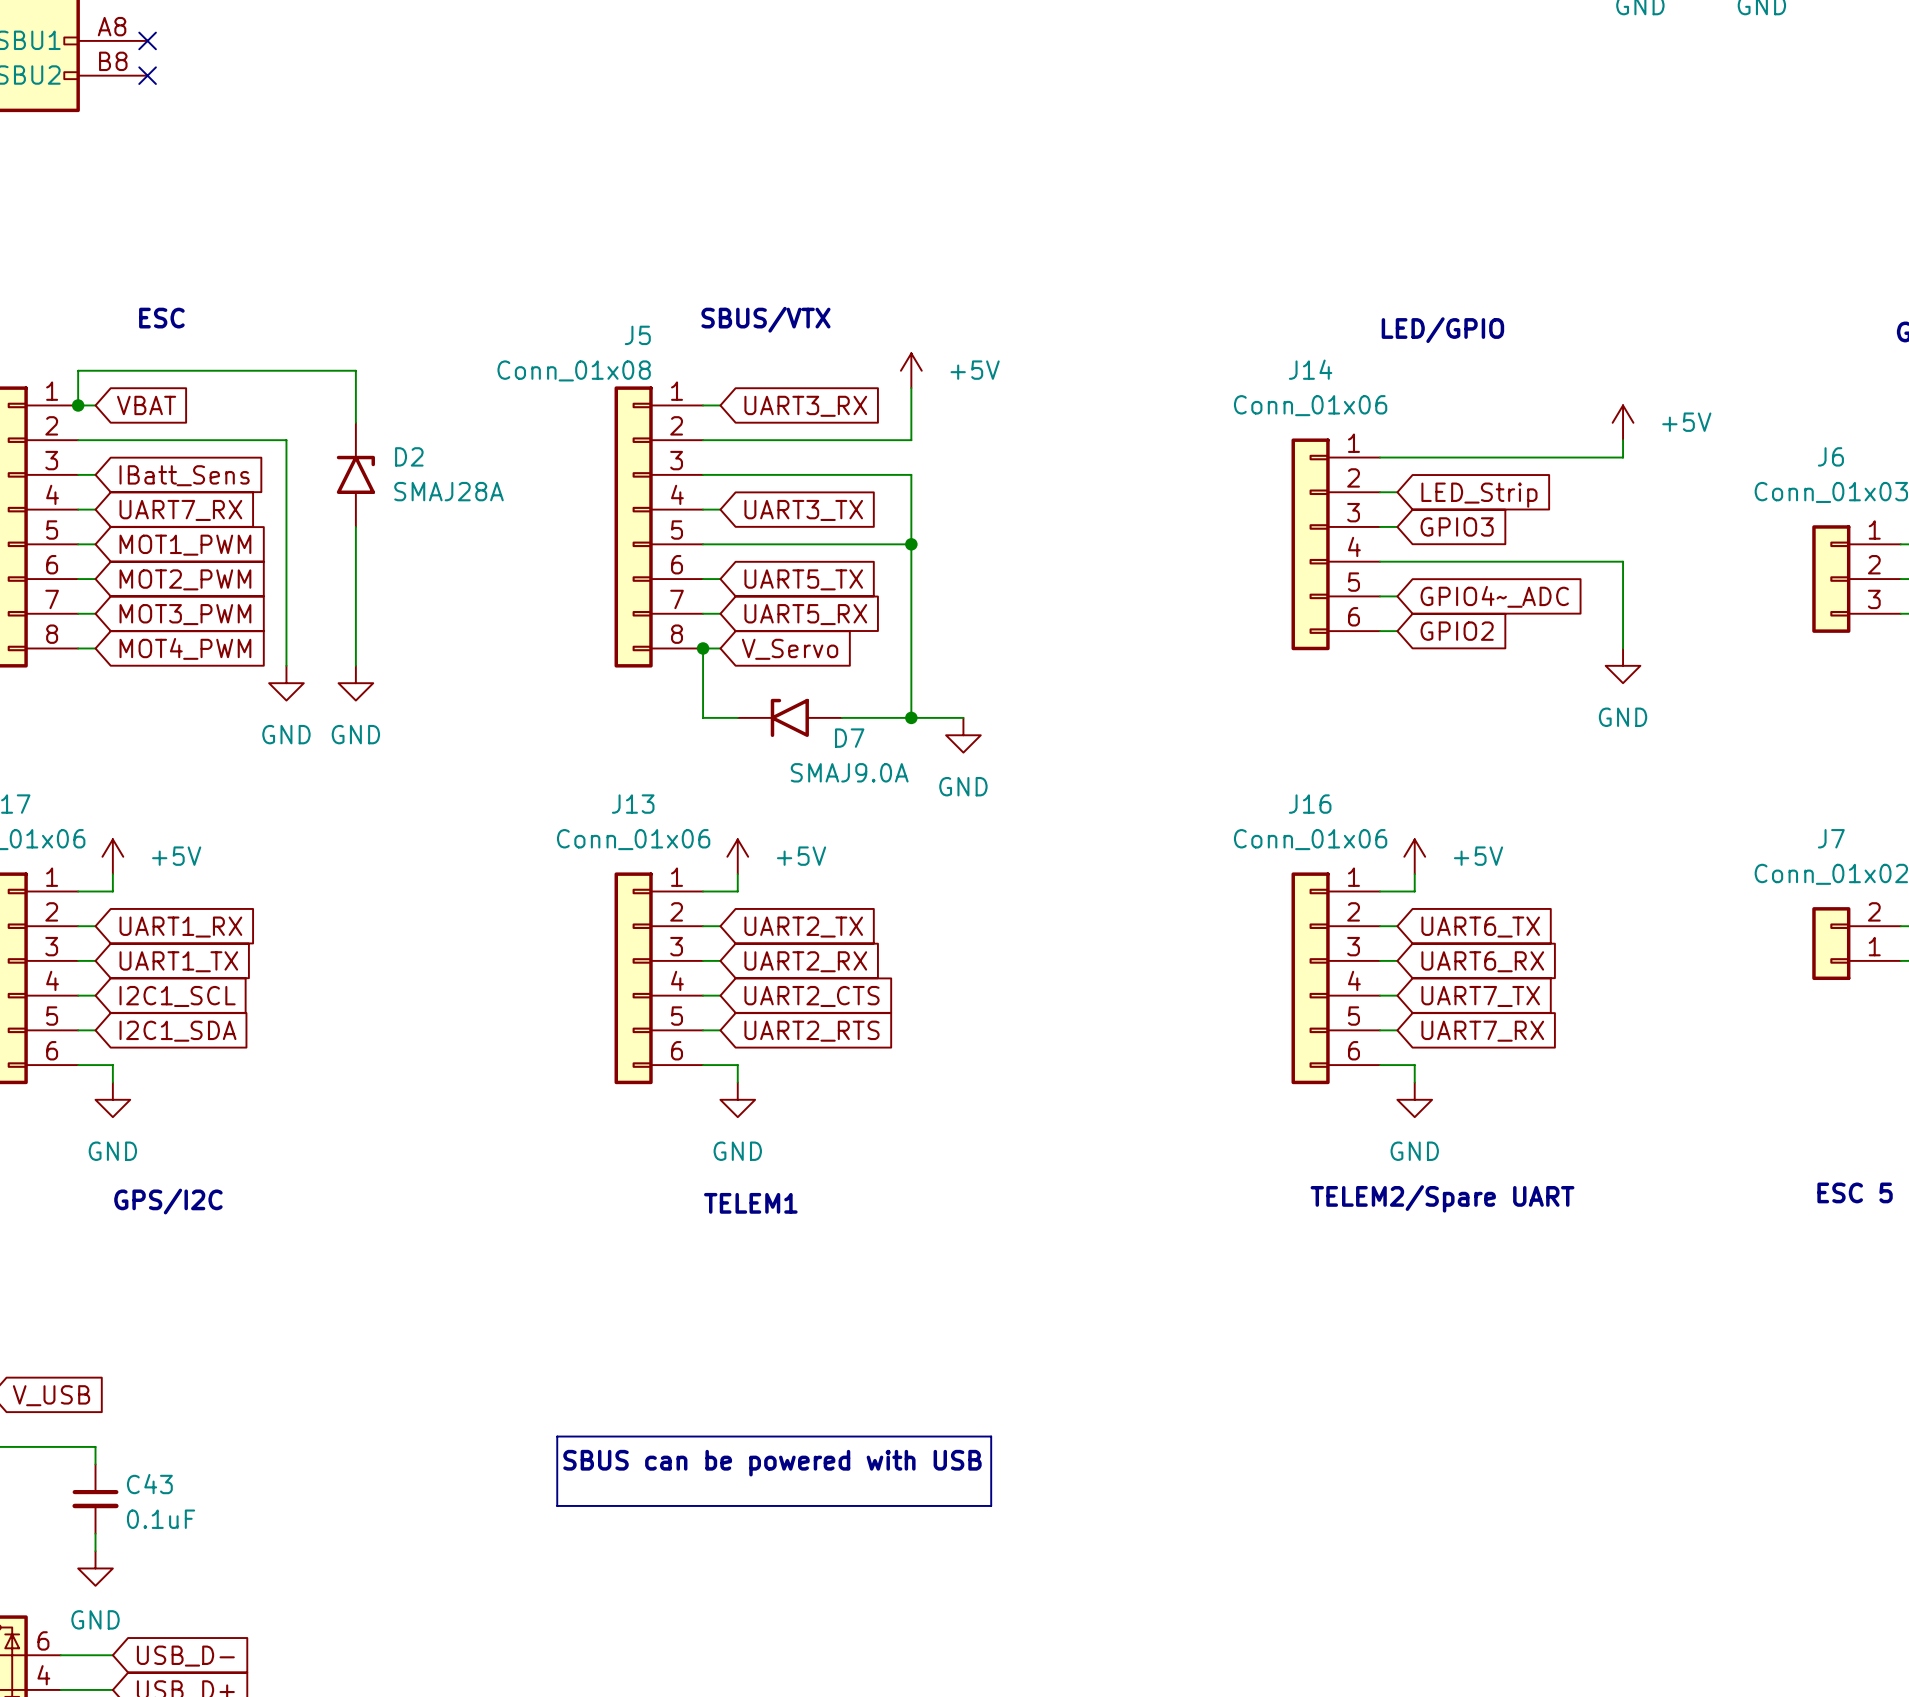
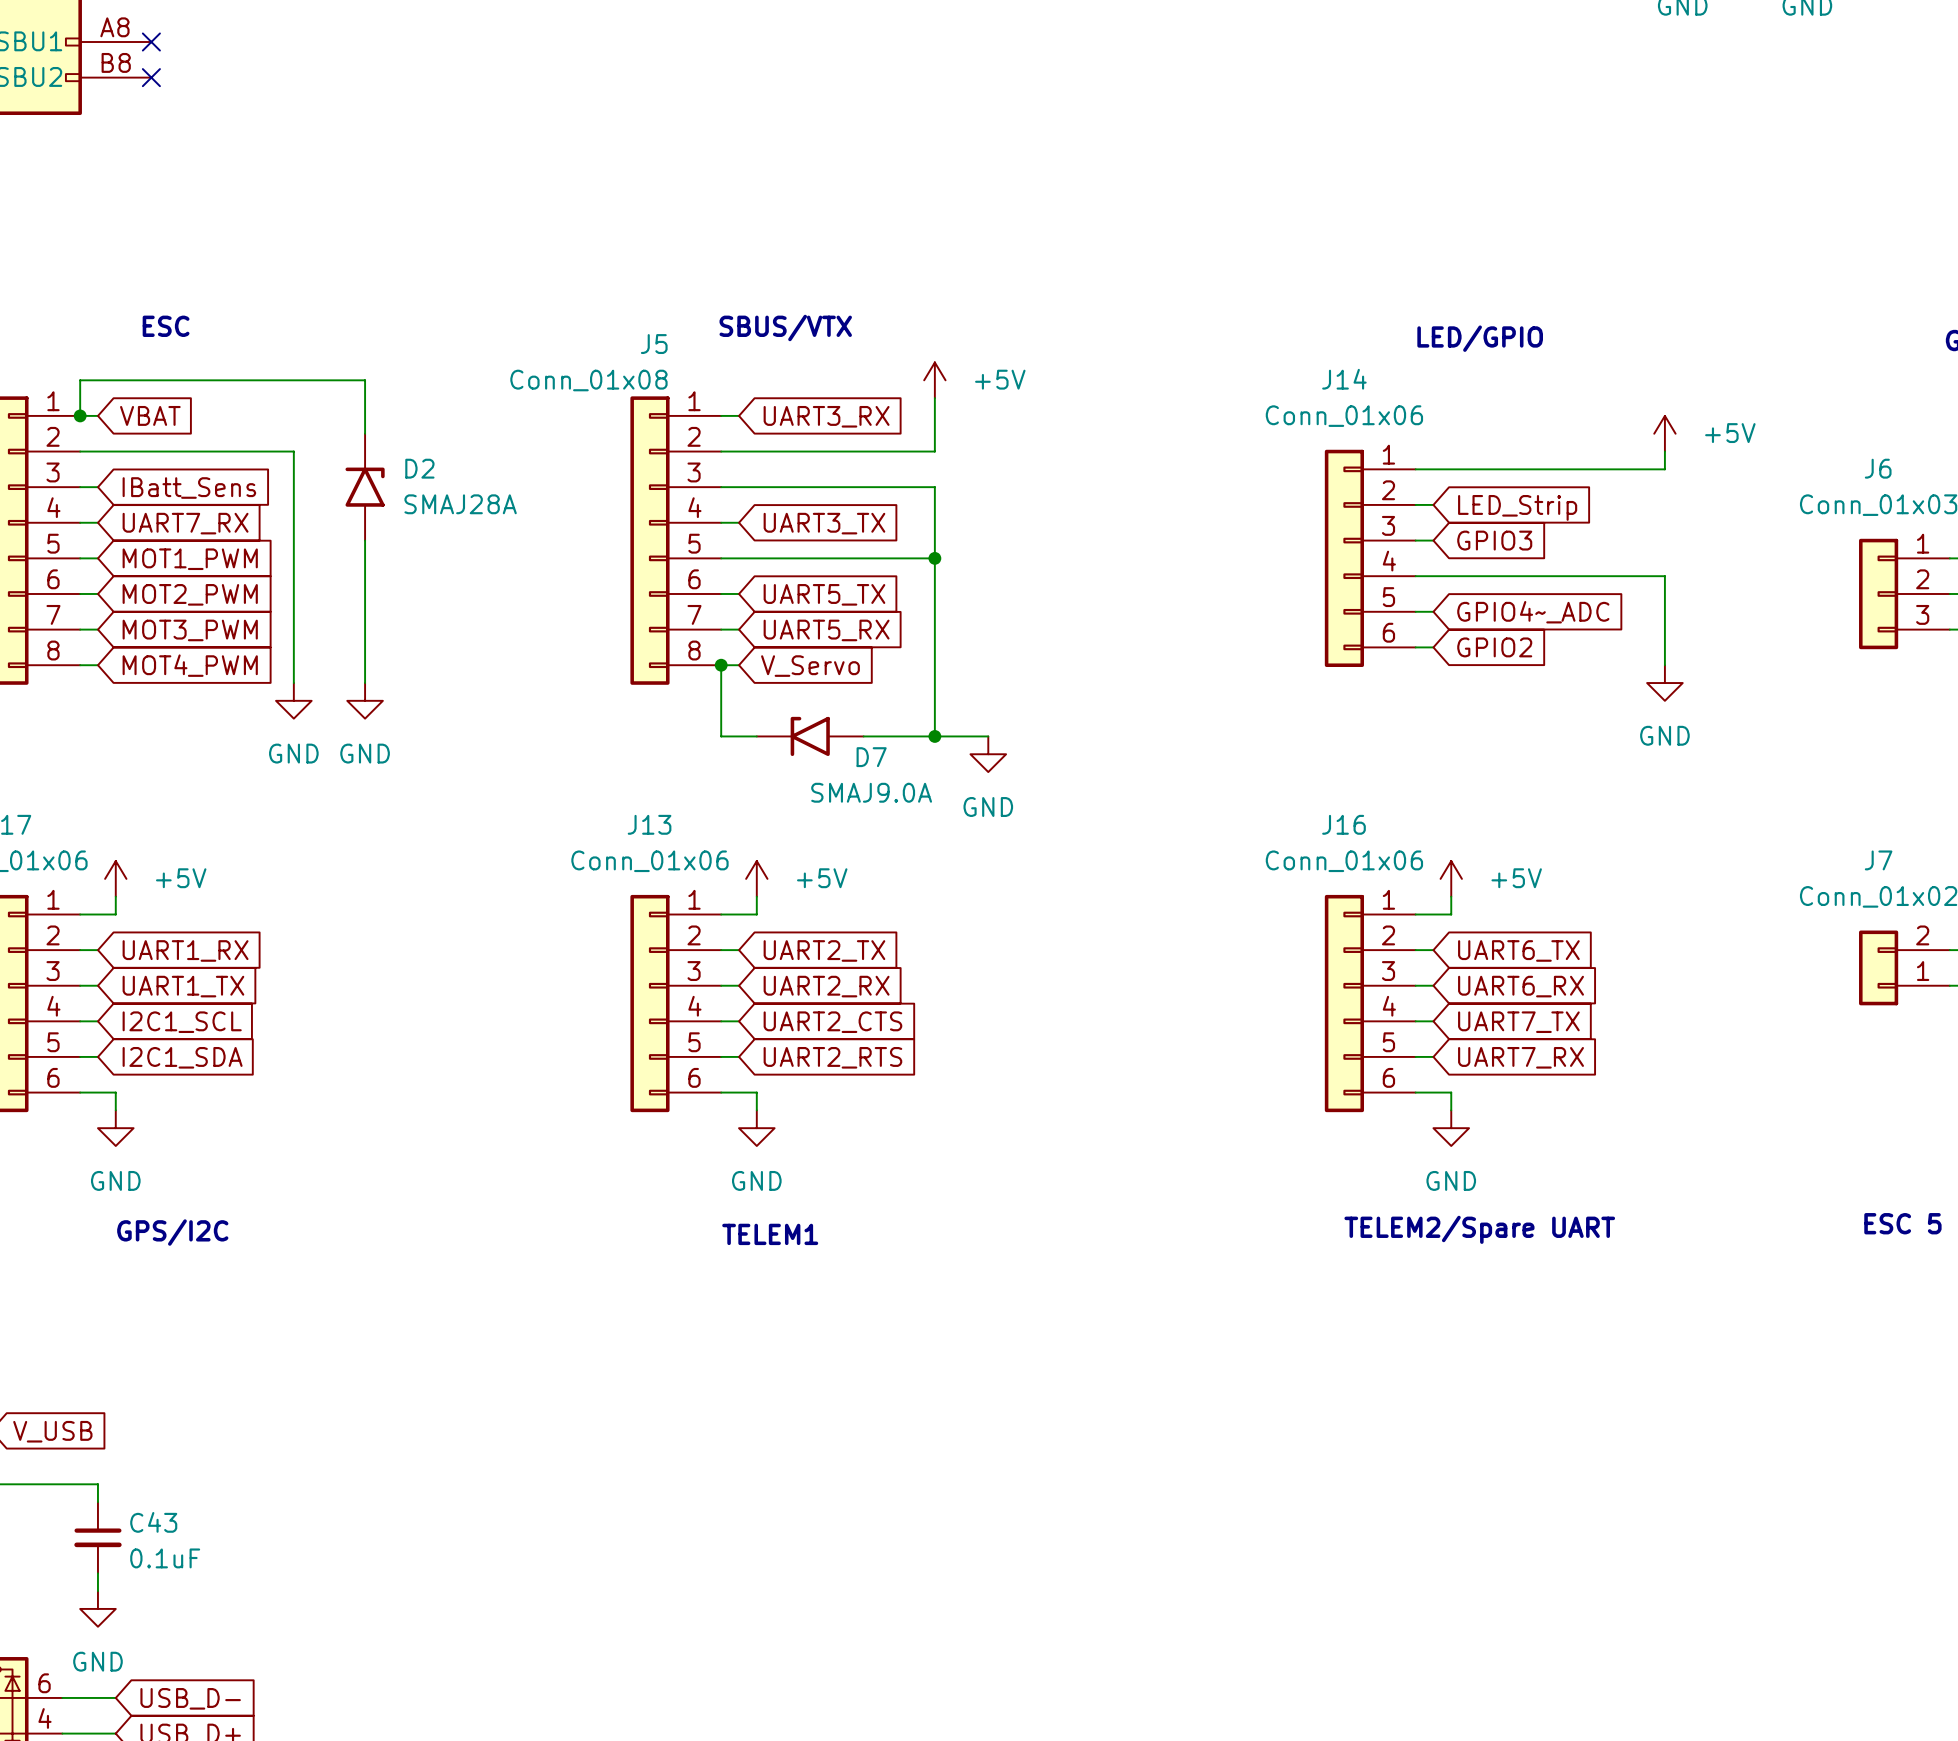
line: (557, 1436) (991, 1436) (991, 1505) (557, 1505) (557, 1436) -> none
text: SBUS can be powered with USB (772, 1463) -> none

